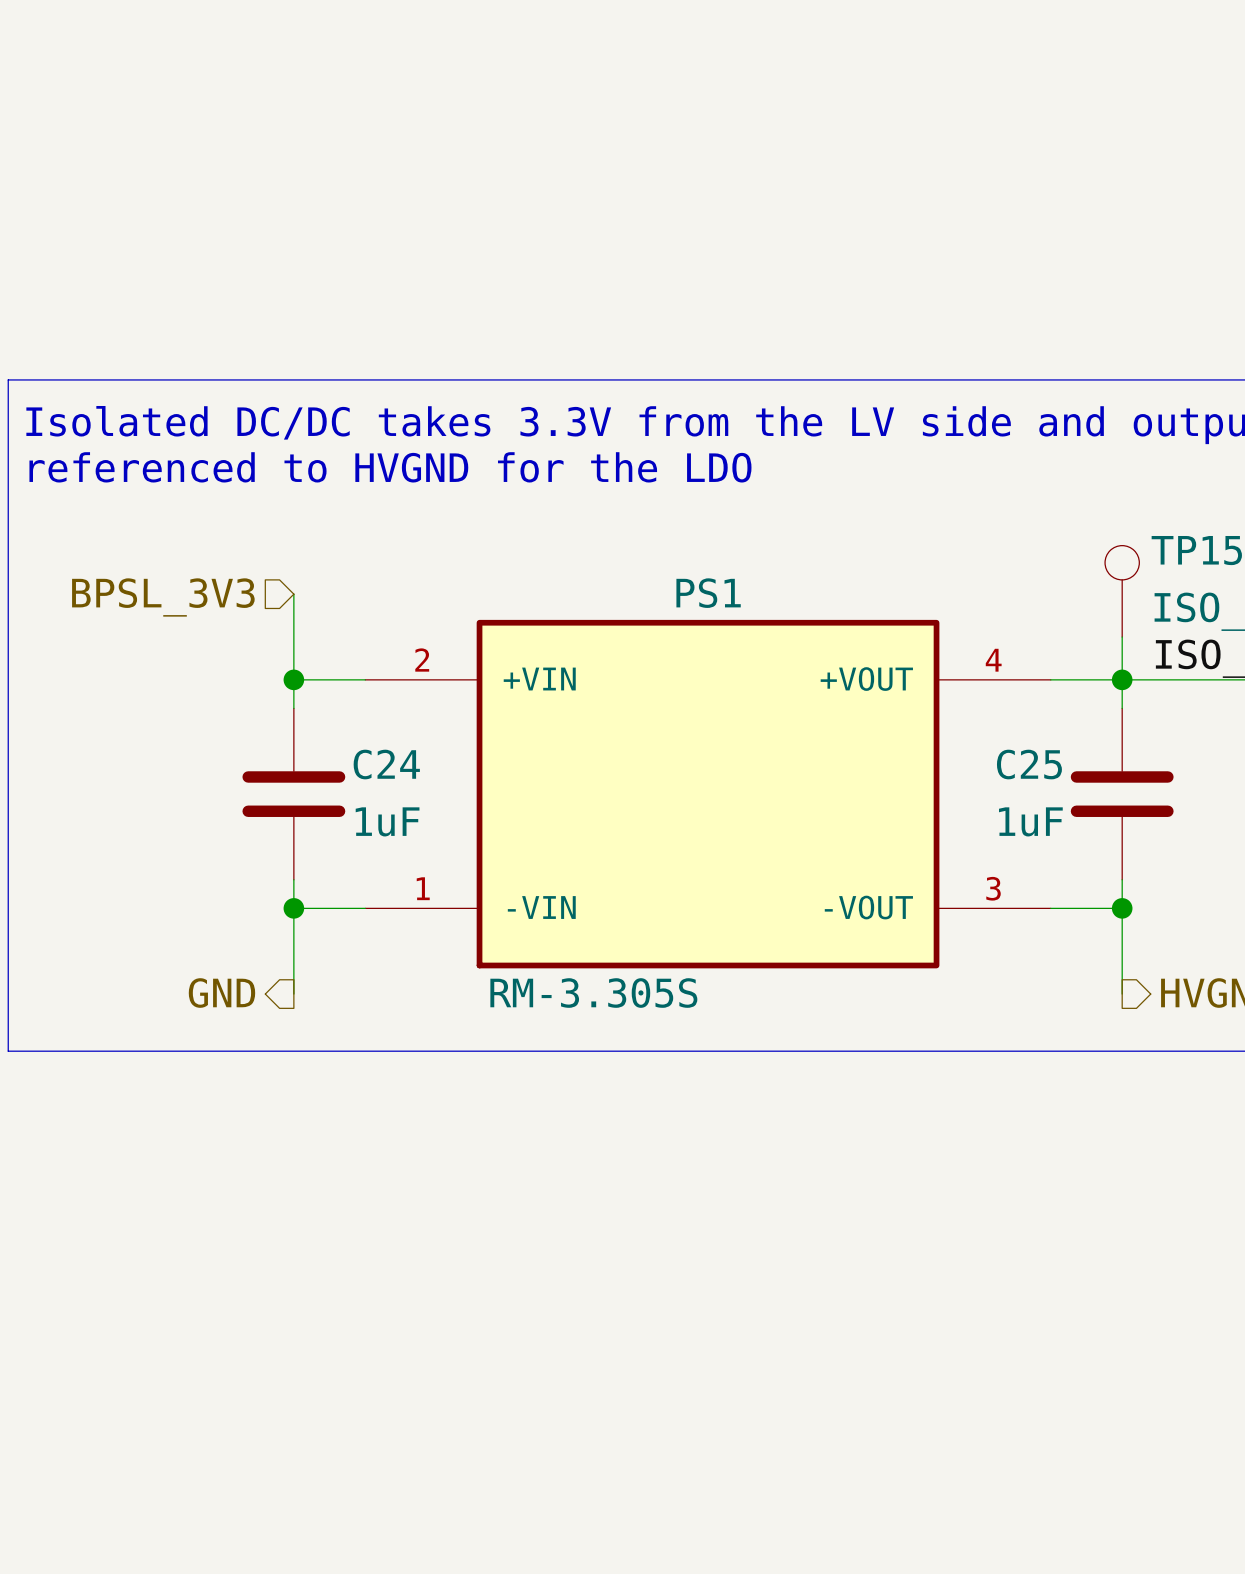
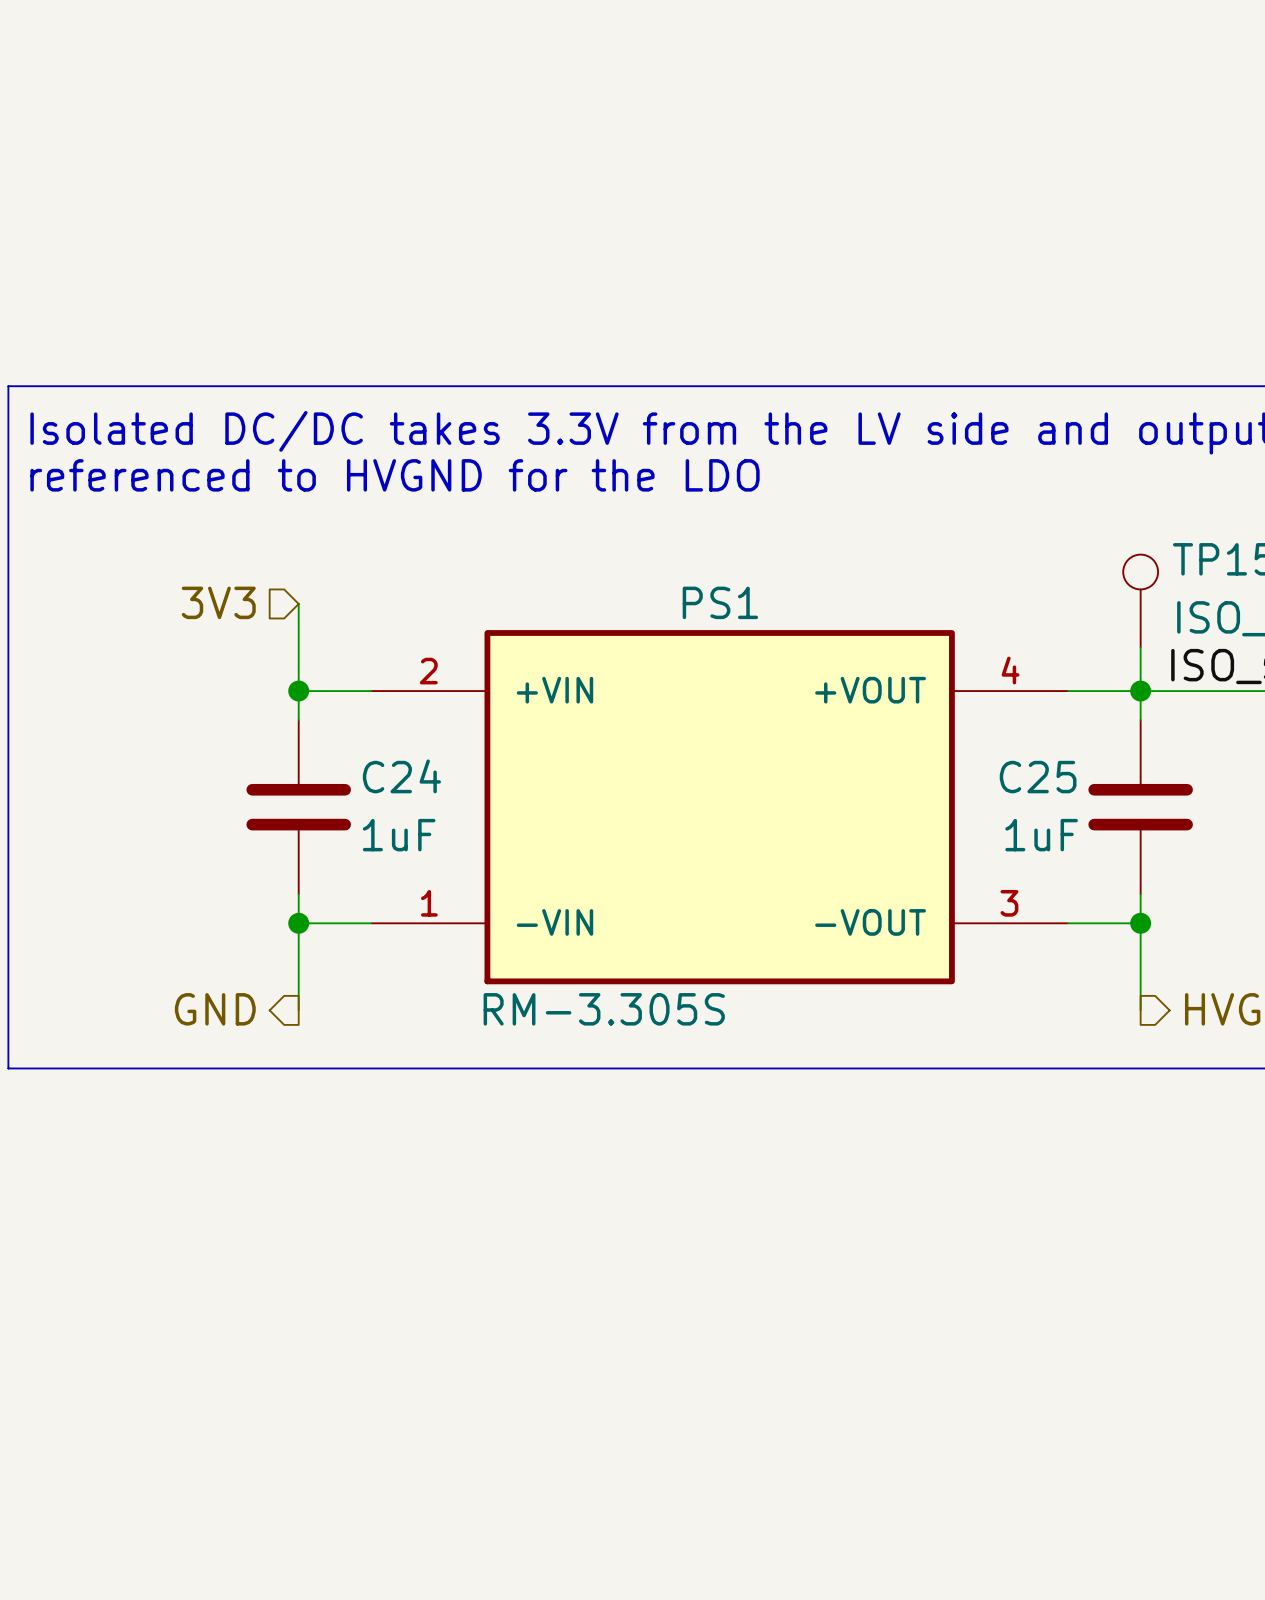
hierarchical label: BPSL_3V3 (163, 597) -> 3V3 (218, 602)

